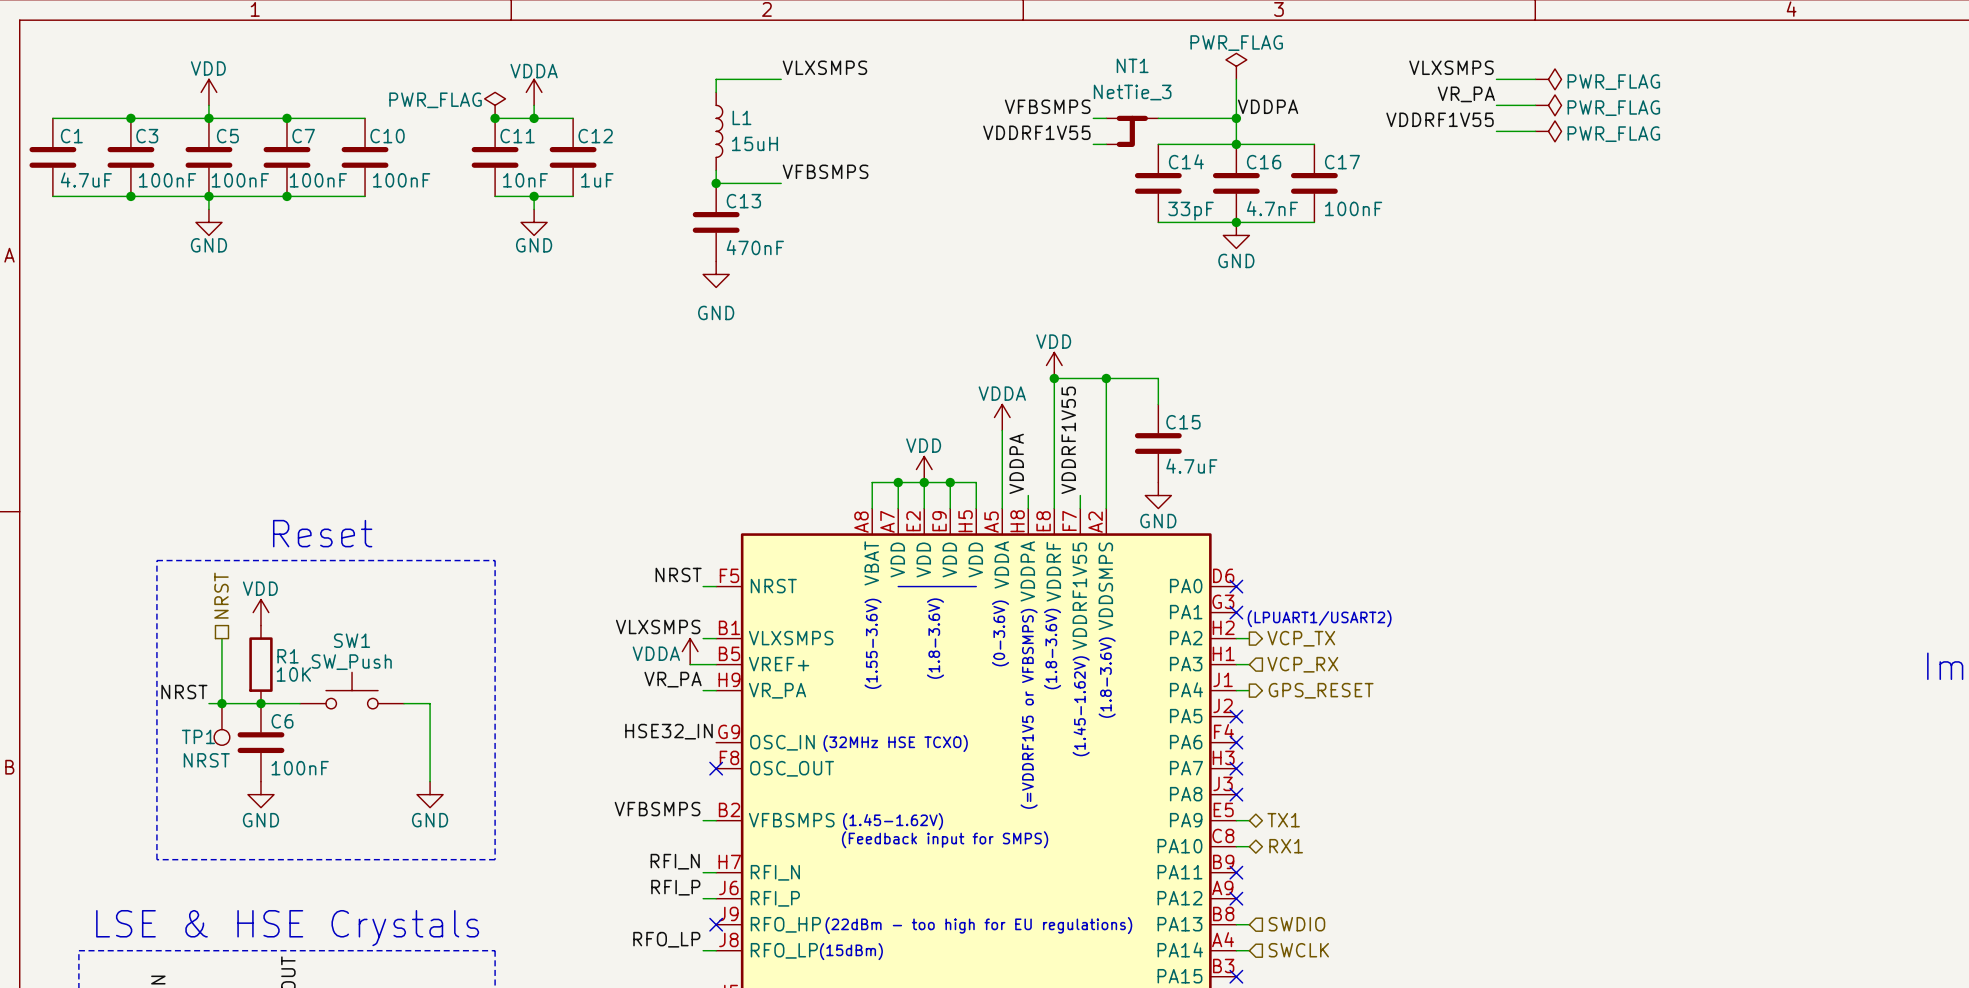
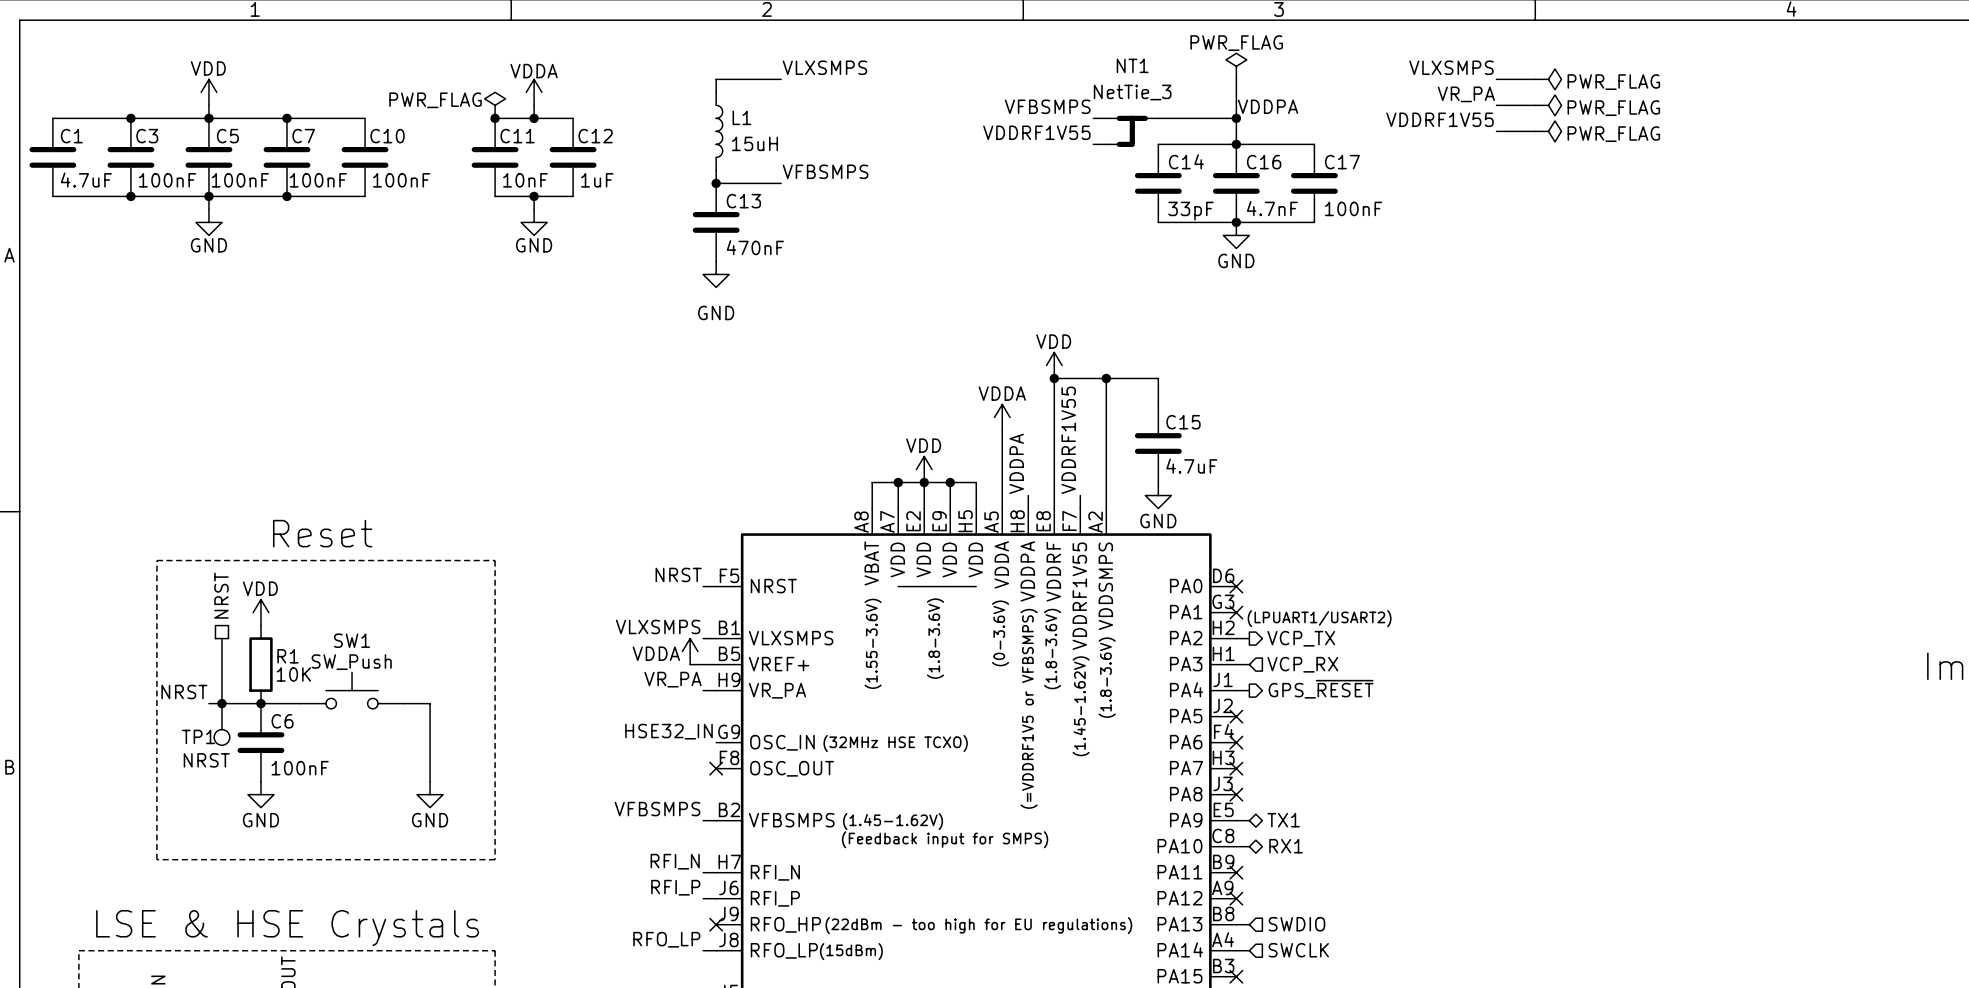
hierarchical label: GPS_RESET (1321, 690) -> GPS_~{RESET} (1321, 689)

